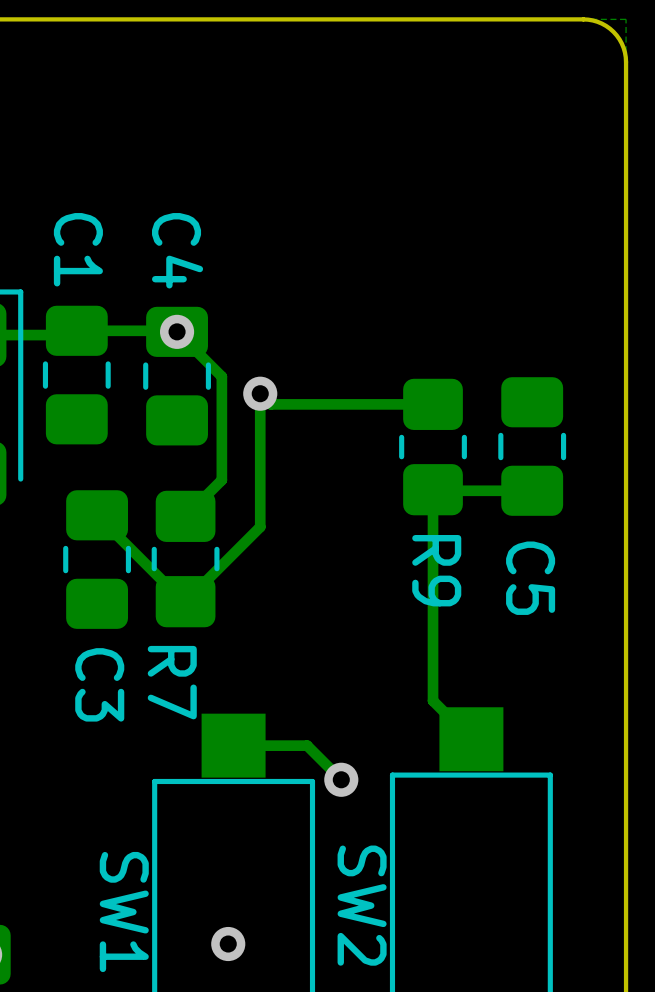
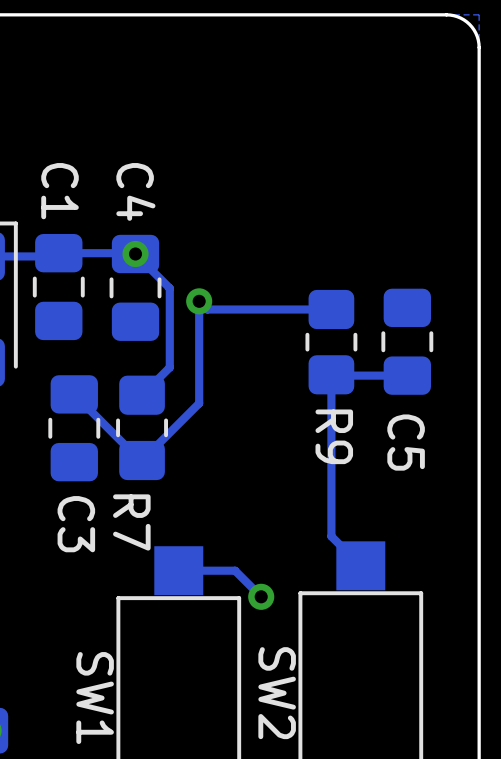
via: (228, 944) -> none

